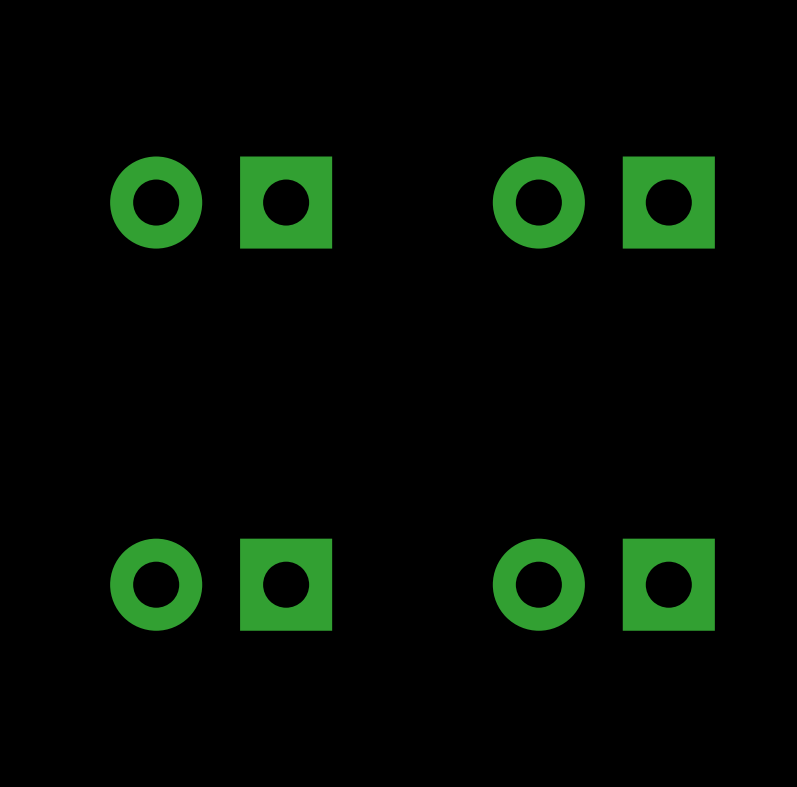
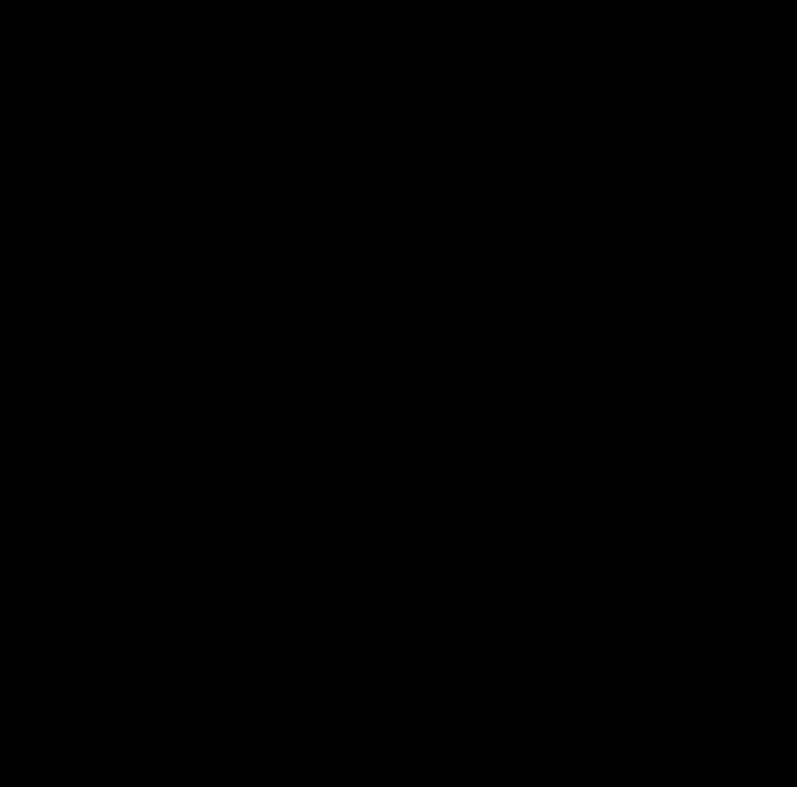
part: (221, 202) -> none
part: (603, 202) -> none
part: (221, 584) -> none
part: (603, 584) -> none

